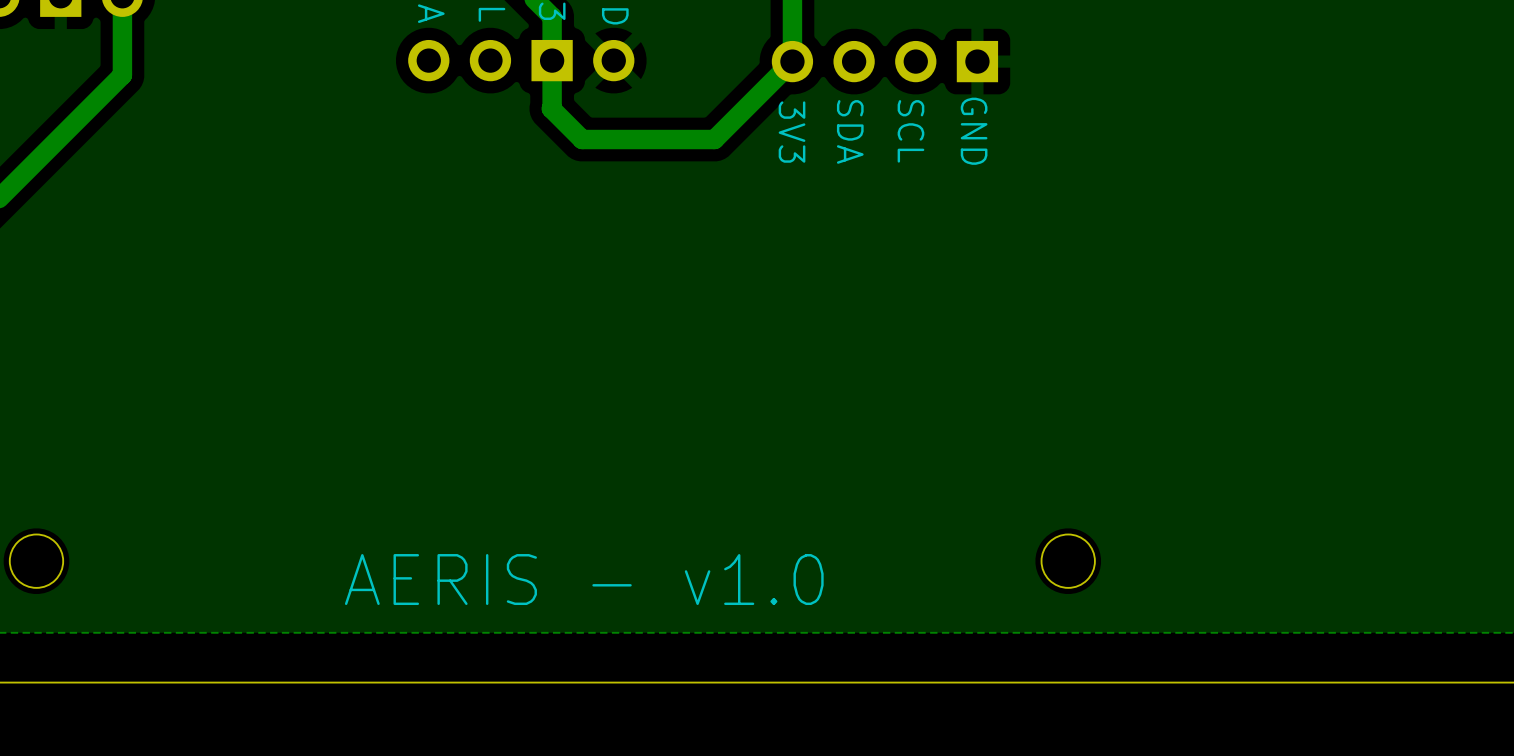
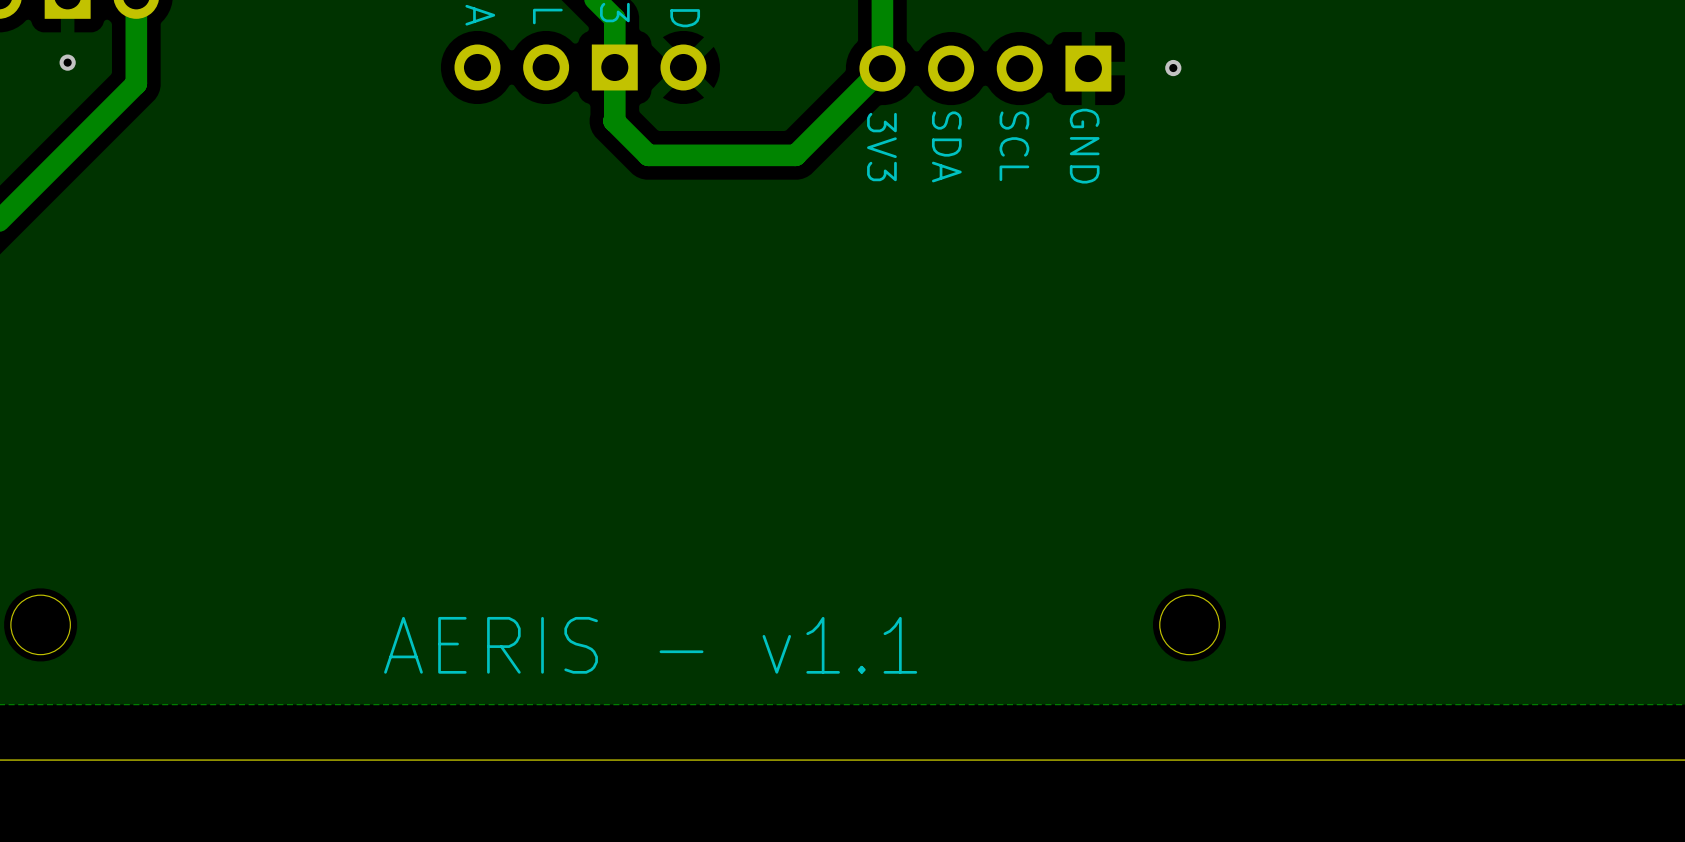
via: none -> (67, 62)
via: none -> (1173, 68)
text: AERIS - v1.0 (584, 579) -> AERIS - v1.1 (650, 645)

